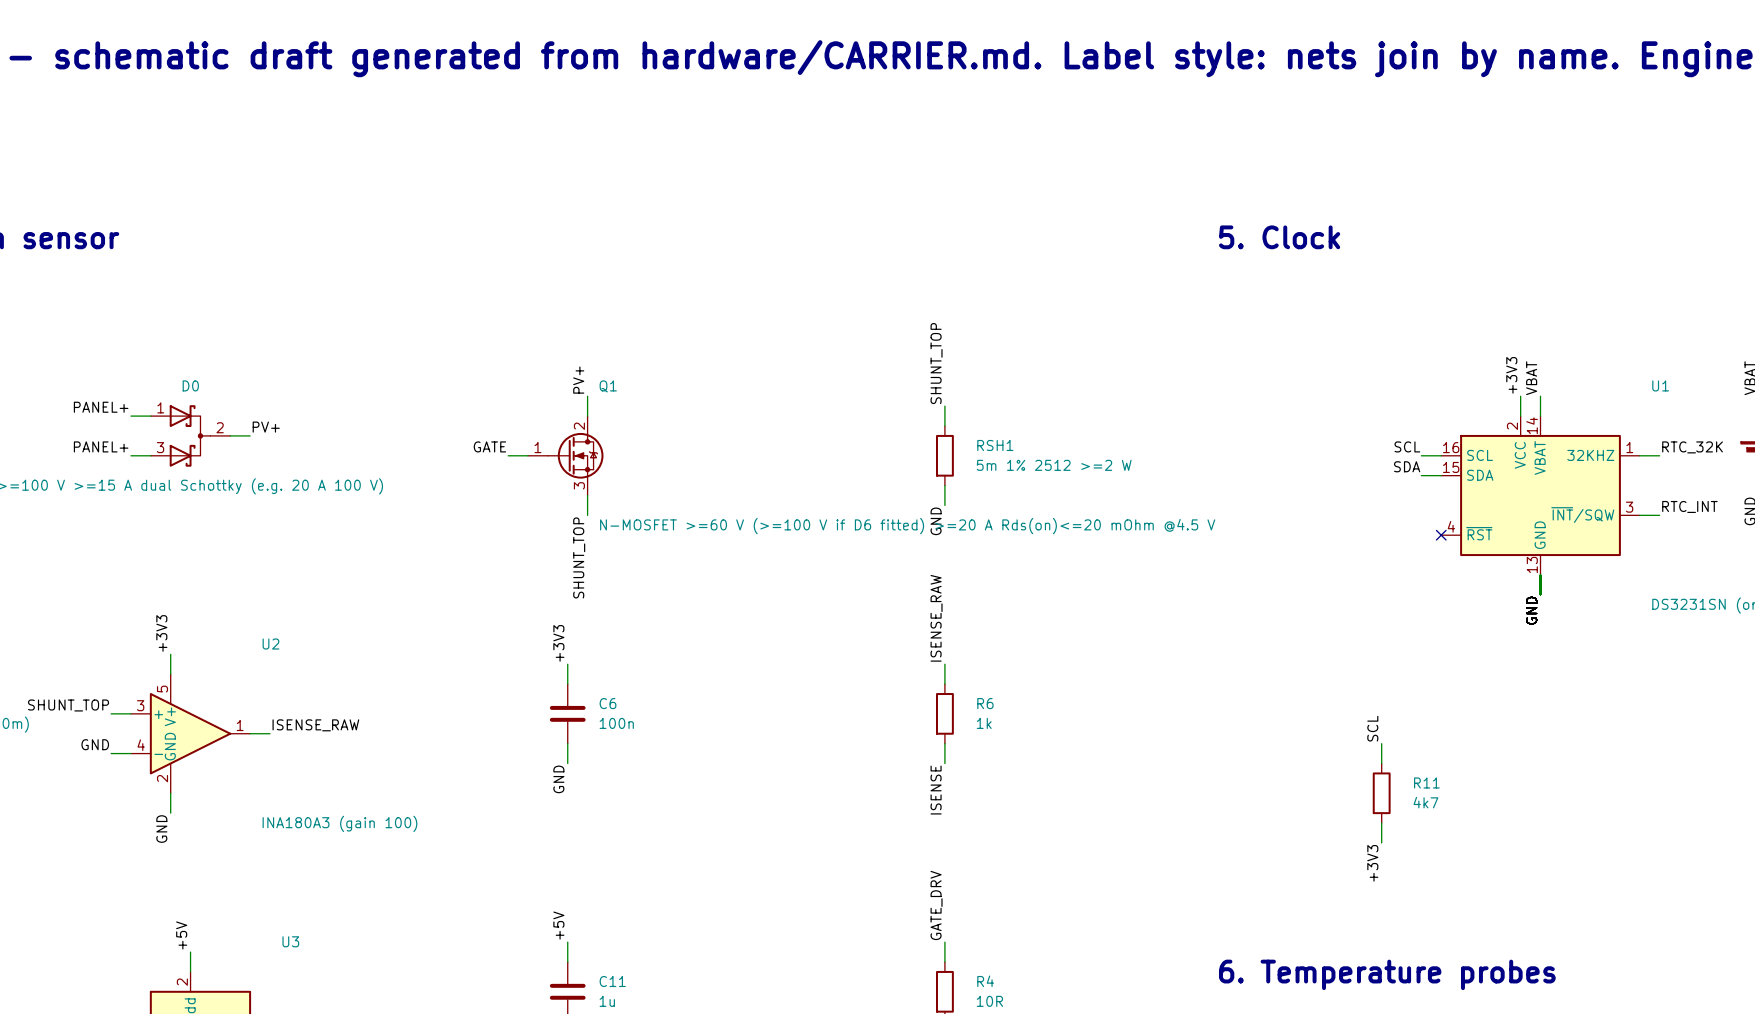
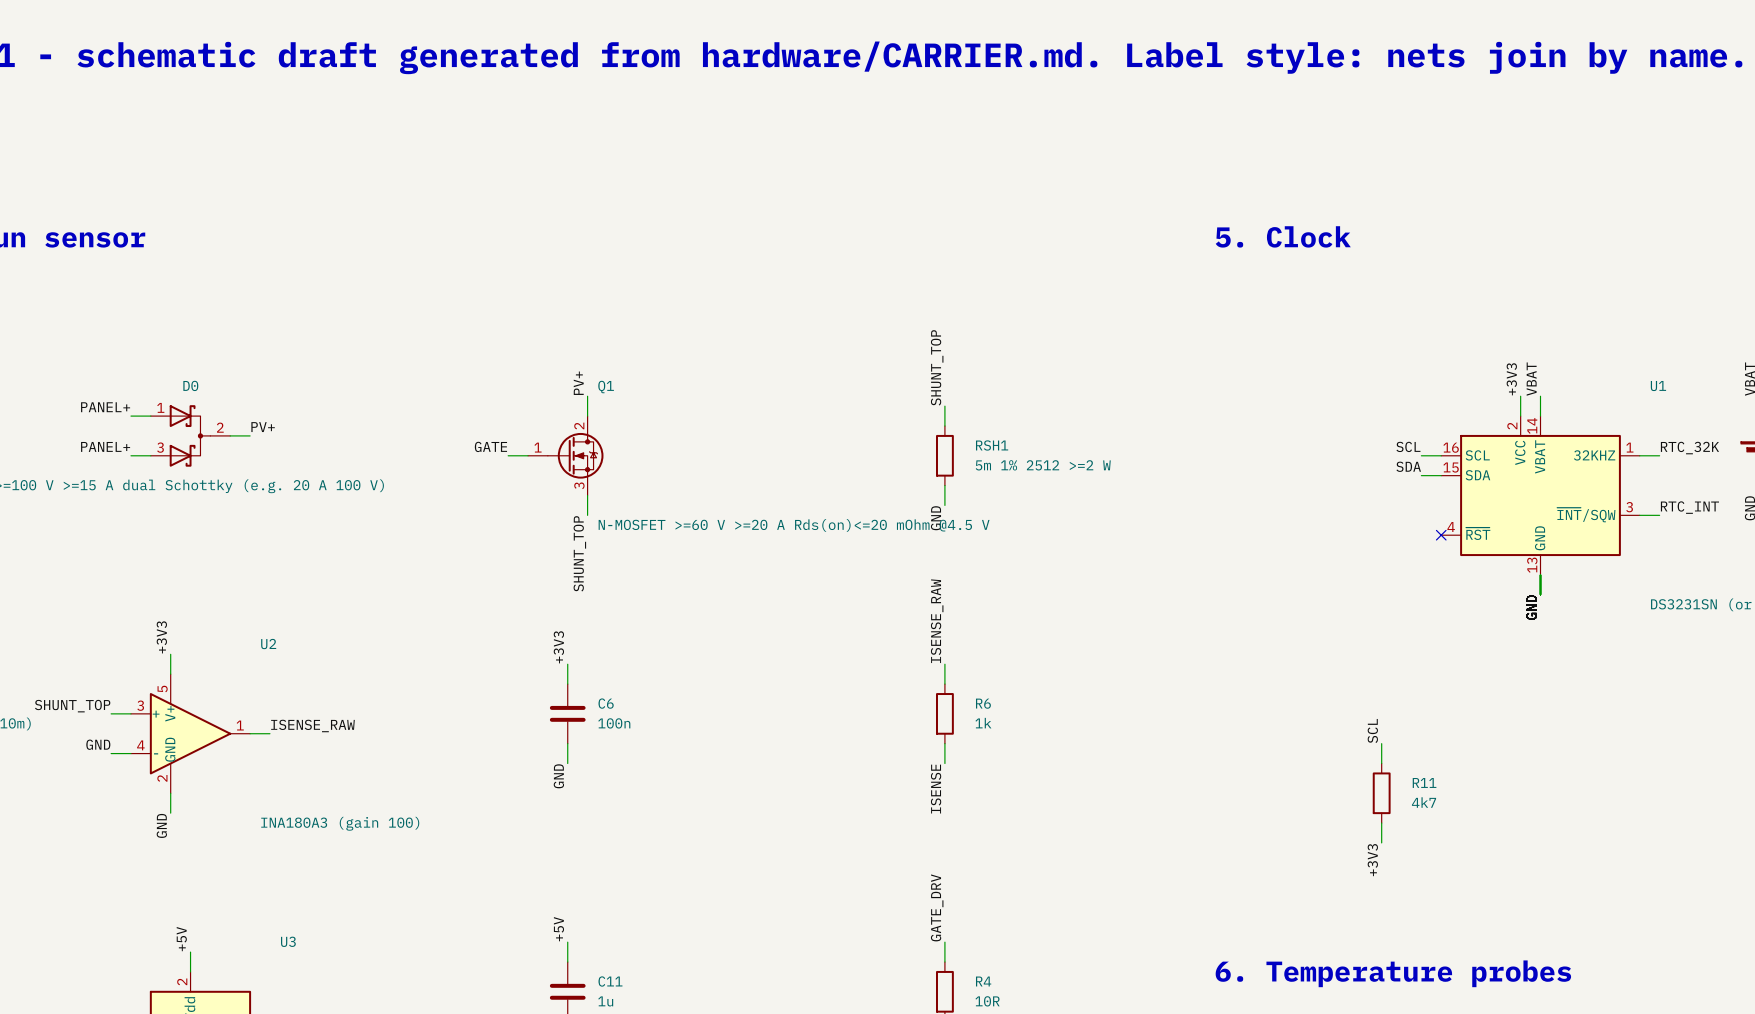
Q1 value: N-MOSFET >=60 V (>=100 V if D6 fitted) >=20 A Rds(on)<=20 mOhm @4.5 V (907, 526) -> N-MOSFET >=60 V >=20 A Rds(on)<=20 mOhm @4.5 V (794, 525)

